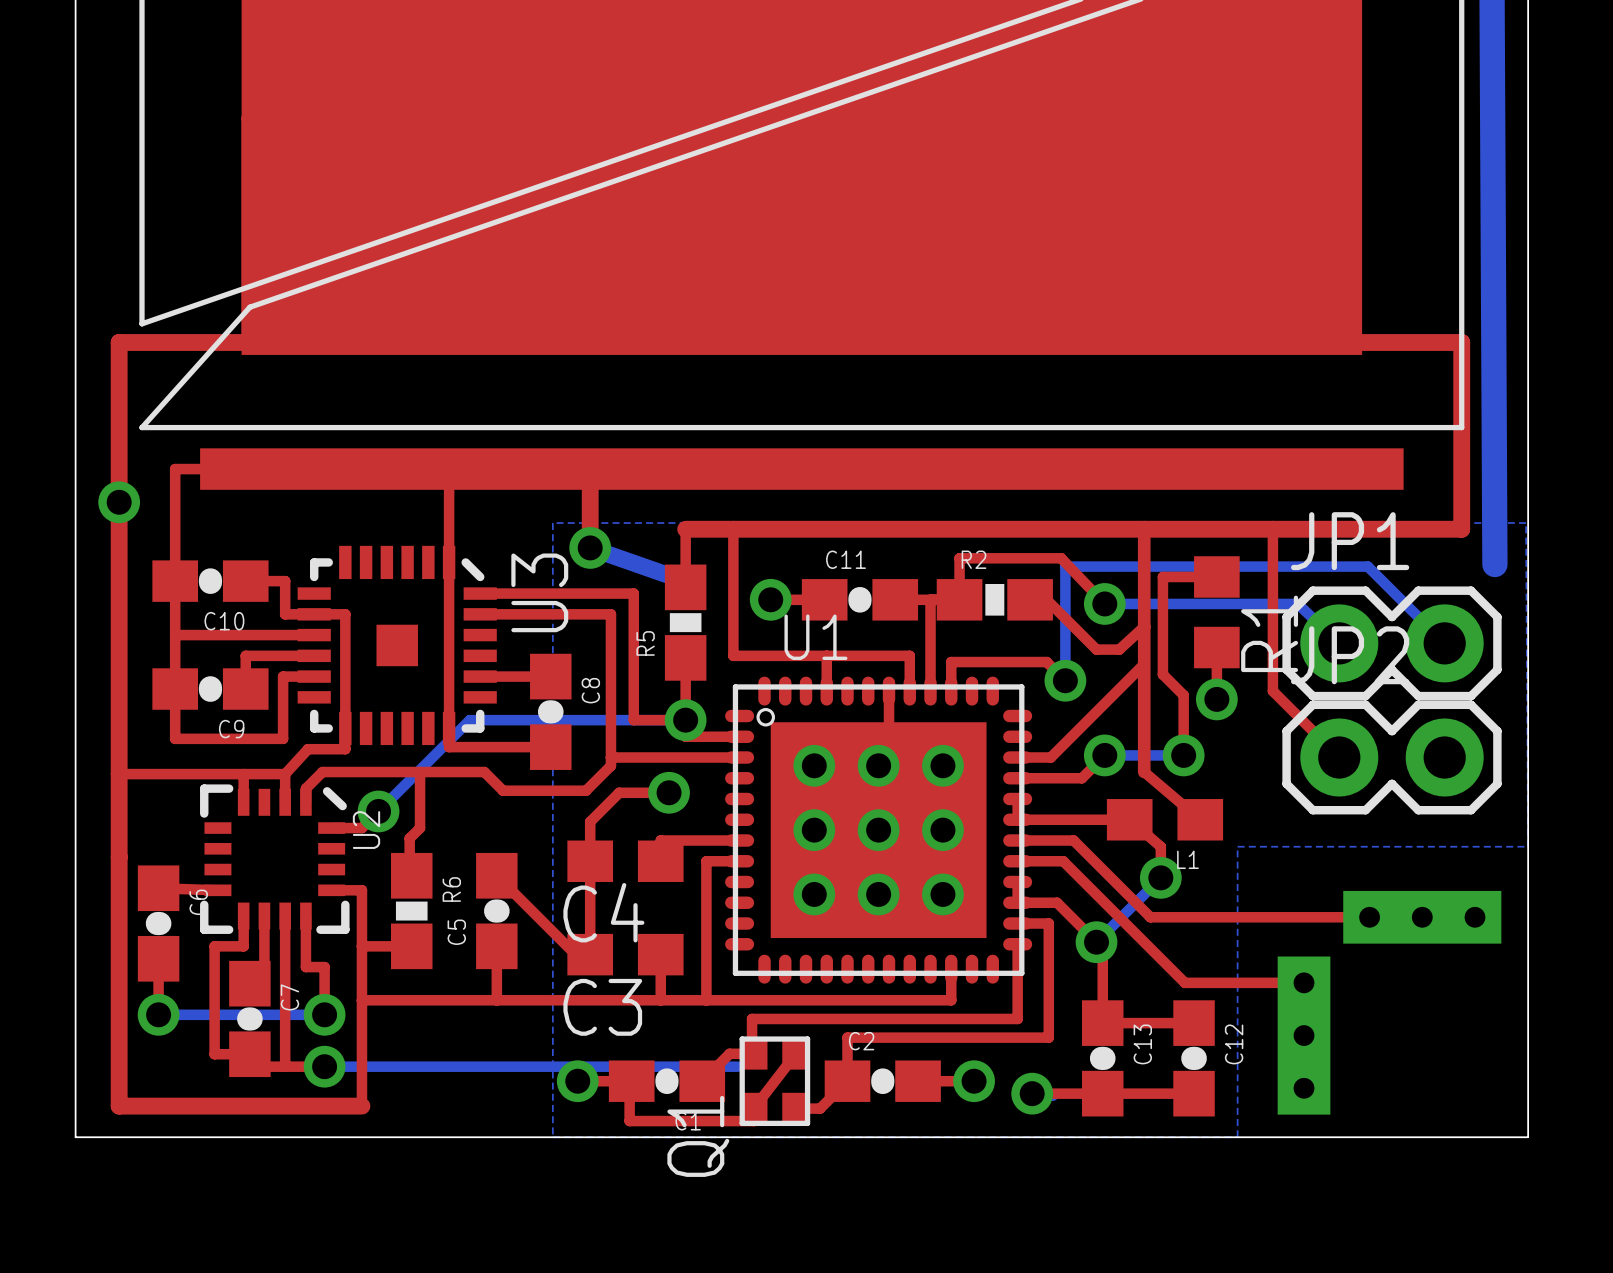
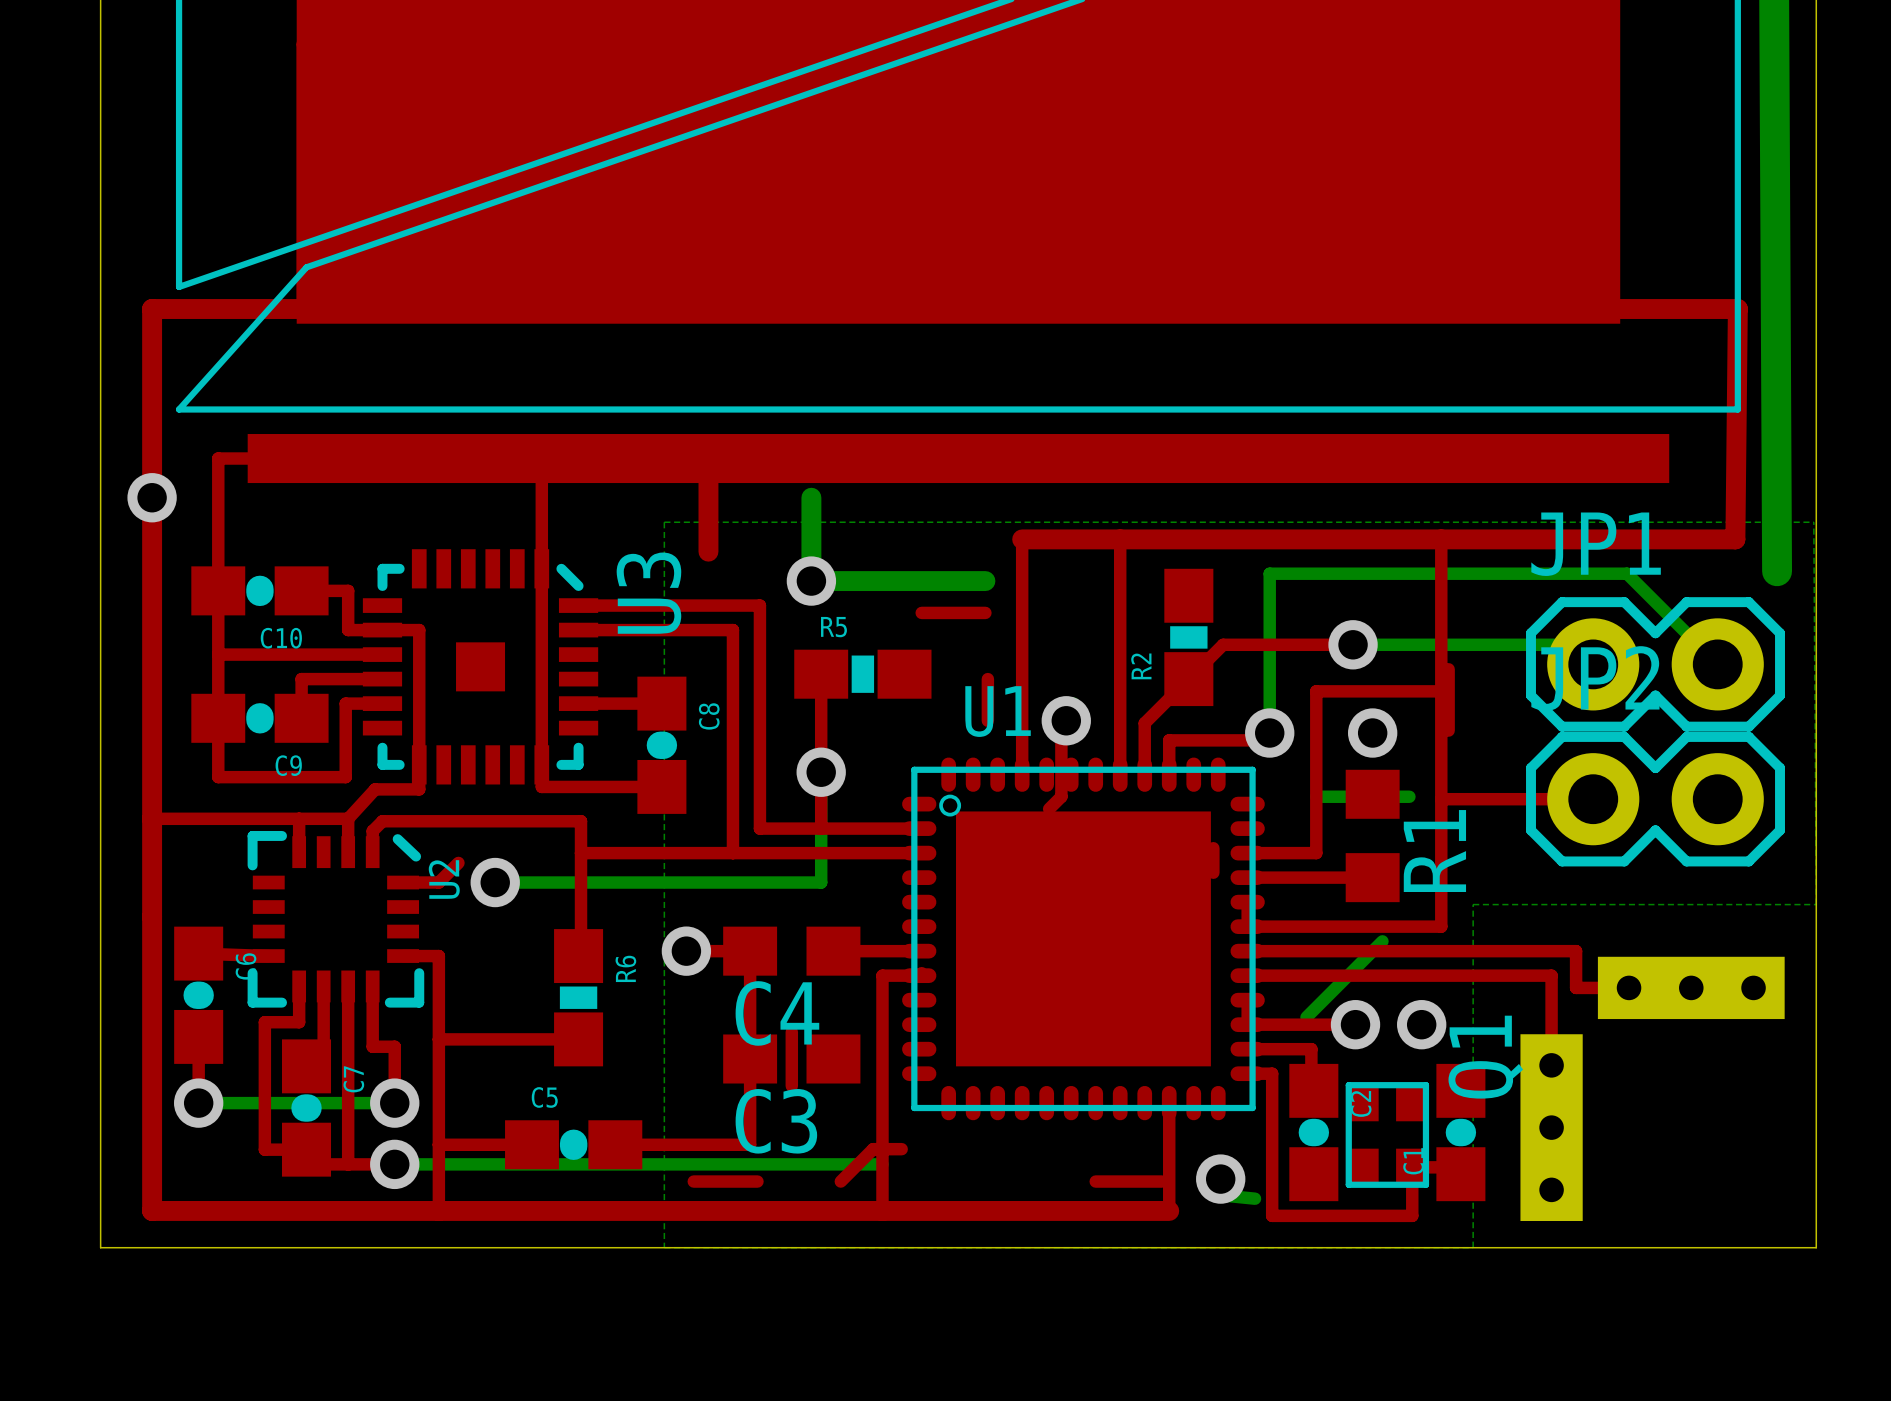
top track: (1461, 342) (1461, 529) (685, 529) (685, 587) -> (1737, 309) (1735, 539) (1022, 539) (1022, 774)
bottom track: none -> (811, 497) (811, 581) (985, 581)
top track: (733, 529) (733, 655) (909, 655) (909, 691) -> none
top track: (1144, 529) (1144, 772) (1200, 819) -> none
top track: (1272, 529) (1272, 691) (1339, 757) -> (1441, 799) (1593, 799)
top track: none -> (1120, 539) (1120, 774)
top track: none -> (1441, 539) (1441, 926) (1247, 926) (1247, 902)
bottom track: (590, 547) (673, 576) -> none
via: (590, 547) -> none
via: none -> (811, 581)
top track: (1216, 576) (1162, 576) (1162, 674) (1183, 695) (1183, 755) -> none
via: (770, 599) -> none
C11: (859, 599) -> none
top track: (895, 599) (959, 599) (959, 558) (1061, 558) (1104, 603) -> none
top track: (930, 599) (930, 691) -> none
R2 rotation: 0° (994, 599) -> 90° clockwise (1188, 637)
top track: (1030, 599) (1046, 599) (1096, 649) (1119, 649) (1144, 626) -> none
bottom track: (1104, 603) (1297, 603) (1339, 643) -> (1353, 644) (1573, 644) (1593, 664)
via position: (1104, 603) -> (1353, 644)
R1 position: (1216, 612) -> (1372, 835)
R5 rotation: 0° (685, 622) -> 90° clockwise (862, 674)
top track: none -> (1353, 644) (1223, 644) (1144, 723) (1144, 774)
top track: (1144, 664) (1050, 757) (1017, 757) -> none
top track: none -> (1441, 693) (1438, 691) (1316, 691) (1316, 853) (1247, 853)
top track: (1065, 680) (1046, 662) (951, 662) (951, 691) -> none
via position: (1065, 680) -> (1269, 733)
via: none -> (1066, 720)
via: (1216, 699) -> none
top track: none -> (1269, 733) (1259, 740) (1169, 740) (1169, 774)
via: none -> (1372, 733)
top track: (633, 720) (685, 720) -> (759, 755) (759, 828) (919, 828)
bottom track: (685, 720) (469, 720) (378, 811) -> none
via position: (685, 720) -> (821, 772)
bottom track: none -> (821, 772) (821, 882) (495, 882)
top track: (685, 736) (739, 736) -> (821, 774) (821, 828)
top track: (1104, 755) (1081, 778) (1017, 778) -> none
via: (1104, 755) -> none
via: (1183, 755) -> none
top track: (610, 757) (739, 757) -> none
top track: (610, 765) (586, 790) (503, 790) (484, 772) (322, 772) (305, 788) -> (578, 956) (581, 956) (581, 821) (382, 821) (372, 831) (372, 835)
top track: none -> (732, 809) (732, 853)
via: (814, 765) -> none
via: (878, 765) -> none
via: (942, 765) -> none
top track: (420, 772) (420, 828) (409, 838) (409, 875) (411, 875) -> none
top track: (669, 792) (619, 792) (590, 821) (590, 954) (575, 954) (496, 875) -> none
via: (669, 792) -> none
top track: none -> (581, 853) (919, 853)
via position: (378, 811) -> (495, 882)
top track: (1017, 817) (1019, 819) (1129, 819) (1160, 846) (1160, 877) -> none
L1: (1164, 819) -> none
top track: none -> (1247, 877) (1372, 877)
via: (814, 830) -> none
U1 position: (878, 830) -> (1083, 938)
via: (878, 830) -> none
via: (942, 830) -> none
top track: (739, 840) (660, 840) (660, 861) -> none
top track: (1017, 840) (1073, 840) (1150, 917) (1324, 917) -> (1247, 951) (1576, 951) (1576, 987)
C4 position: (625, 861) -> (791, 951)
top track: (739, 861) (706, 861) (706, 1000) -> none
top track: (1017, 861) (1063, 861) (1184, 982) (1304, 982) -> (1247, 975) (1551, 975) (1551, 1065)
via: (1160, 877) -> none
top track: (1017, 882) (1017, 902) (1057, 902) (1102, 948) (1102, 1023) (1194, 1023) -> none
top track: none -> (686, 951) (750, 951) (750, 1144) (615, 1144)
via: none -> (686, 951)
top track: none -> (833, 951) (919, 951)
via: (814, 894) -> none
via: (878, 894) -> none
via: (942, 894) -> none
top track: none -> (921, 973) (919, 975) (882, 975) (882, 1210)
R6 position: (411, 911) -> (578, 997)
C5 rotation: 0° (496, 911) -> 90° clockwise (573, 1144)
C5 position: (496, 911) -> (573, 1144)
top track: (1017, 923) (1048, 923) (1048, 1037) (847, 1037) (847, 1081) (820, 1108) (795, 1108) -> none
top track: none -> (1247, 1000) (1247, 1024) (1355, 1024)
via: (1096, 942) -> none
top track: (1017, 944) (1017, 1018) (752, 1018) (752, 1053) -> none
top track: (361, 946) (411, 946) -> none
top track: (496, 946) (496, 1000) -> none
via: none -> (1355, 1024)
via: none -> (1421, 1024)
C3 position: (625, 954) -> (791, 1058)
top track: none -> (438, 1039) (578, 1039)
top track: (951, 969) (951, 1000) (361, 1000) -> none
top track: none -> (1247, 1049) (1311, 1049) (1311, 1093) (1313, 1090) (1325, 1105)
top track: none -> (1247, 1073) (1272, 1073) (1272, 1215) (1412, 1215) (1412, 1167) (1454, 1167) (1460, 1174)
top track: none -> (1169, 1103) (1169, 1210) (438, 1210)
top track: none -> (438, 1144) (531, 1144)
top track: (795, 1053) (753, 1108) -> none
C13: (1102, 1058) -> none
C12: (1194, 1058) -> none
via: (577, 1081) -> none
top track: (629, 1081) (629, 1121) (754, 1121) (754, 1108) -> none
C1 rotation: 0° (666, 1081) -> 90° clockwise (1460, 1132)
C1 position: (666, 1081) -> (1460, 1132)
Q1 position: (774, 1081) -> (1387, 1134)
C2 rotation: 0° (882, 1081) -> 90° clockwise (1313, 1132)
C2 position: (882, 1081) -> (1313, 1132)
via: (974, 1081) -> none
top track: (1032, 1093) (1194, 1093) -> none
via position: (1032, 1093) -> (1220, 1179)
Q1 name position: Q1 (698, 1136) -> Q1 (1485, 1057)

